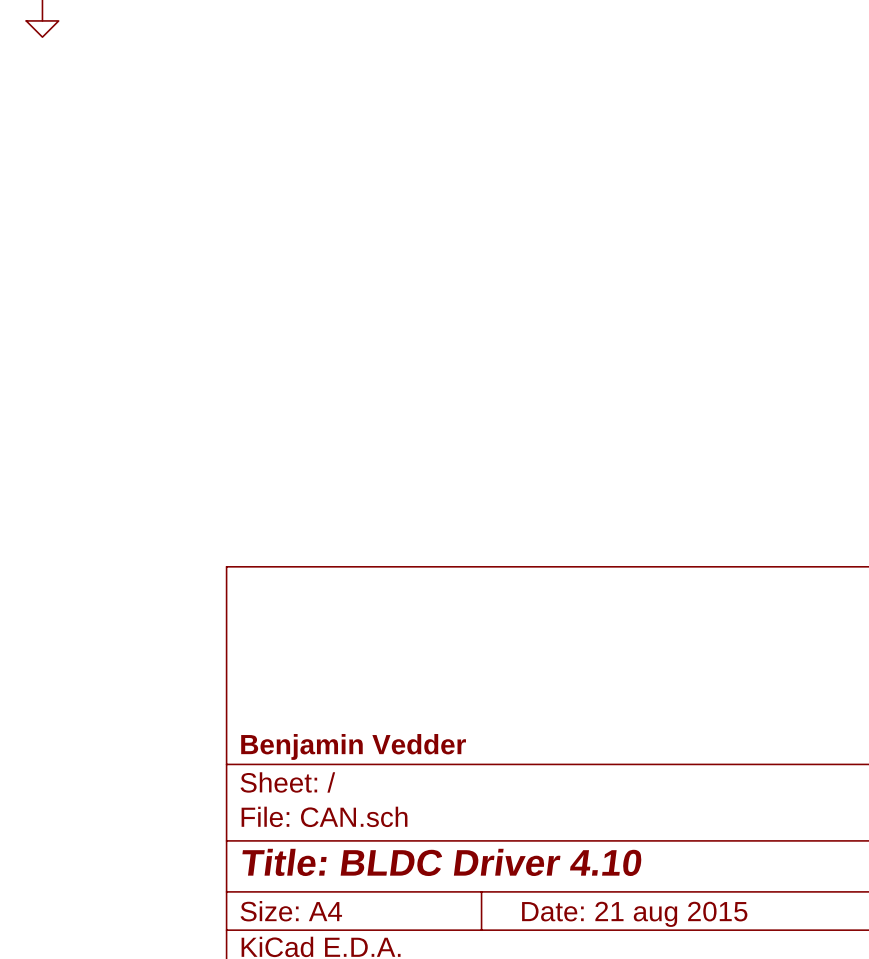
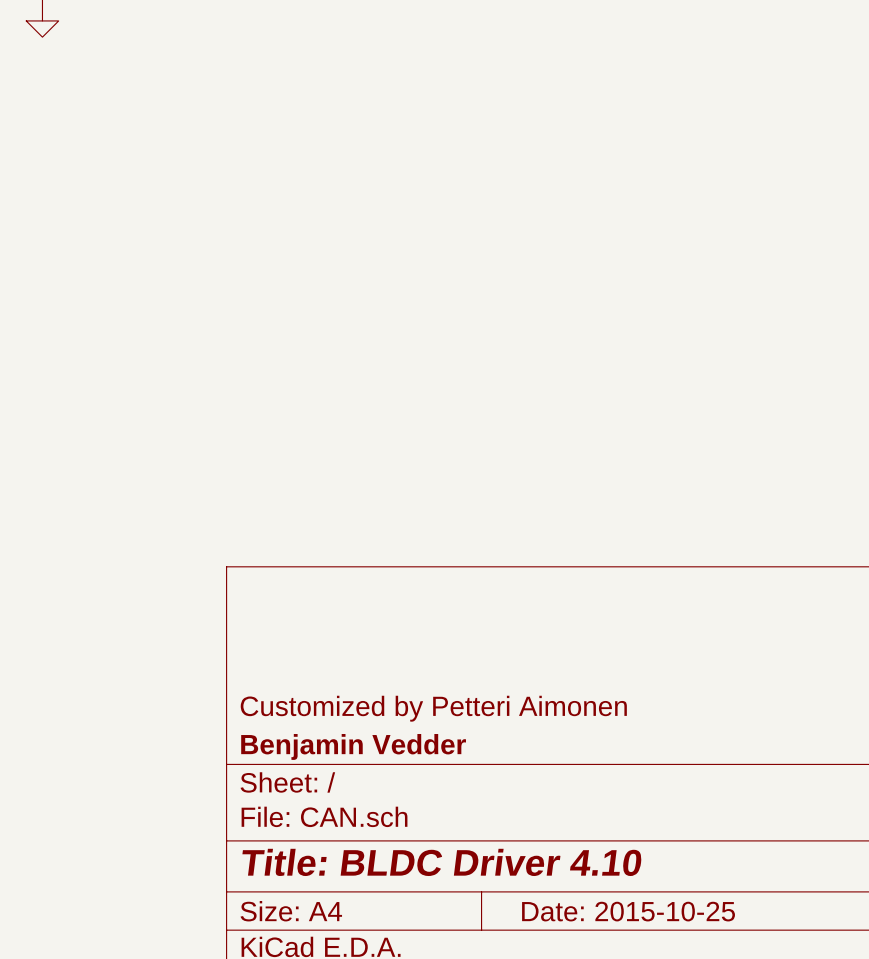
title block: none -> Customized by Petteri Aimonen (433, 708)
title block: Date: 21 aug 2015 (634, 914) -> Date: 2015-10-25 (628, 911)

